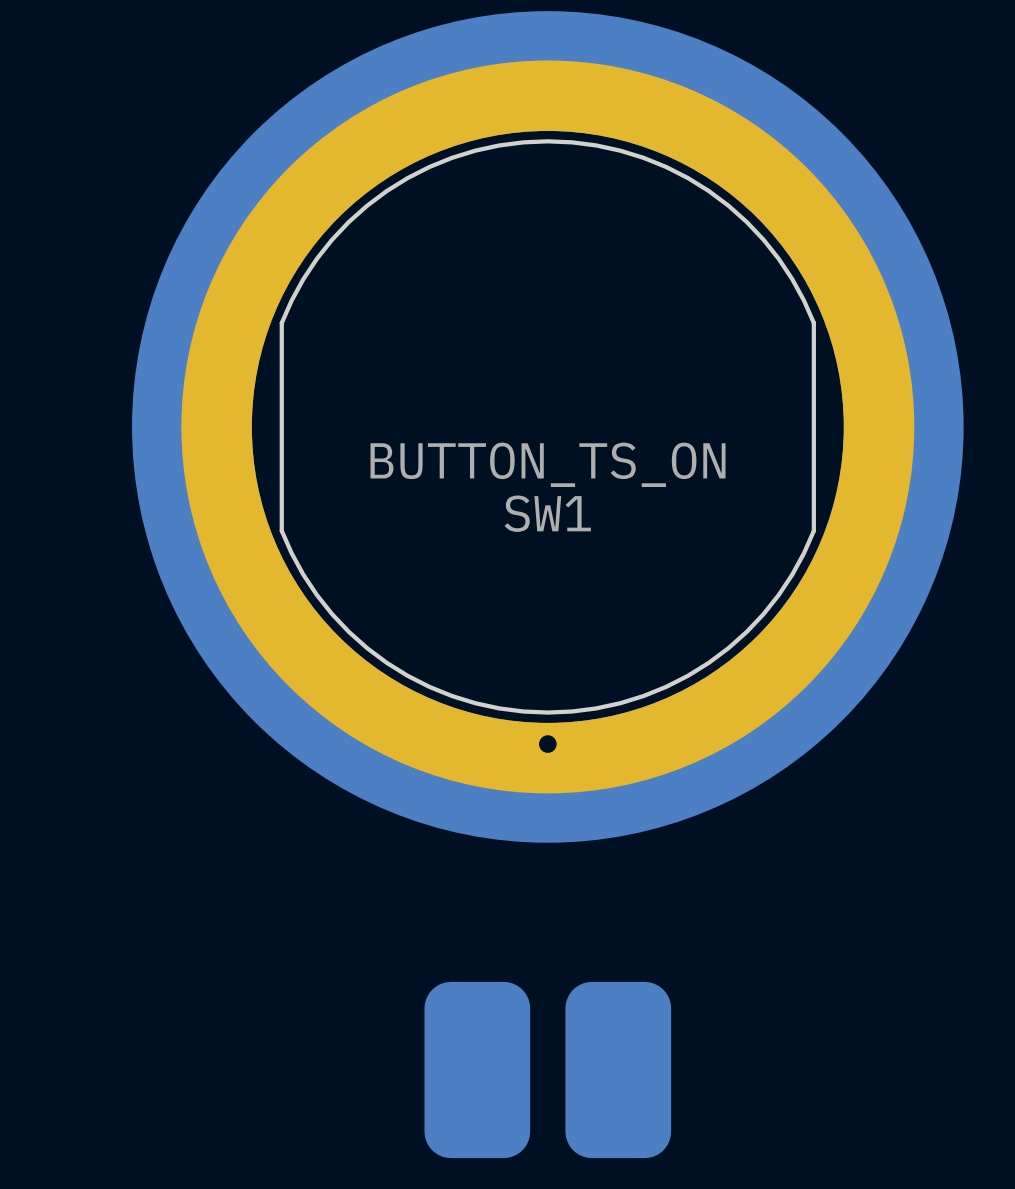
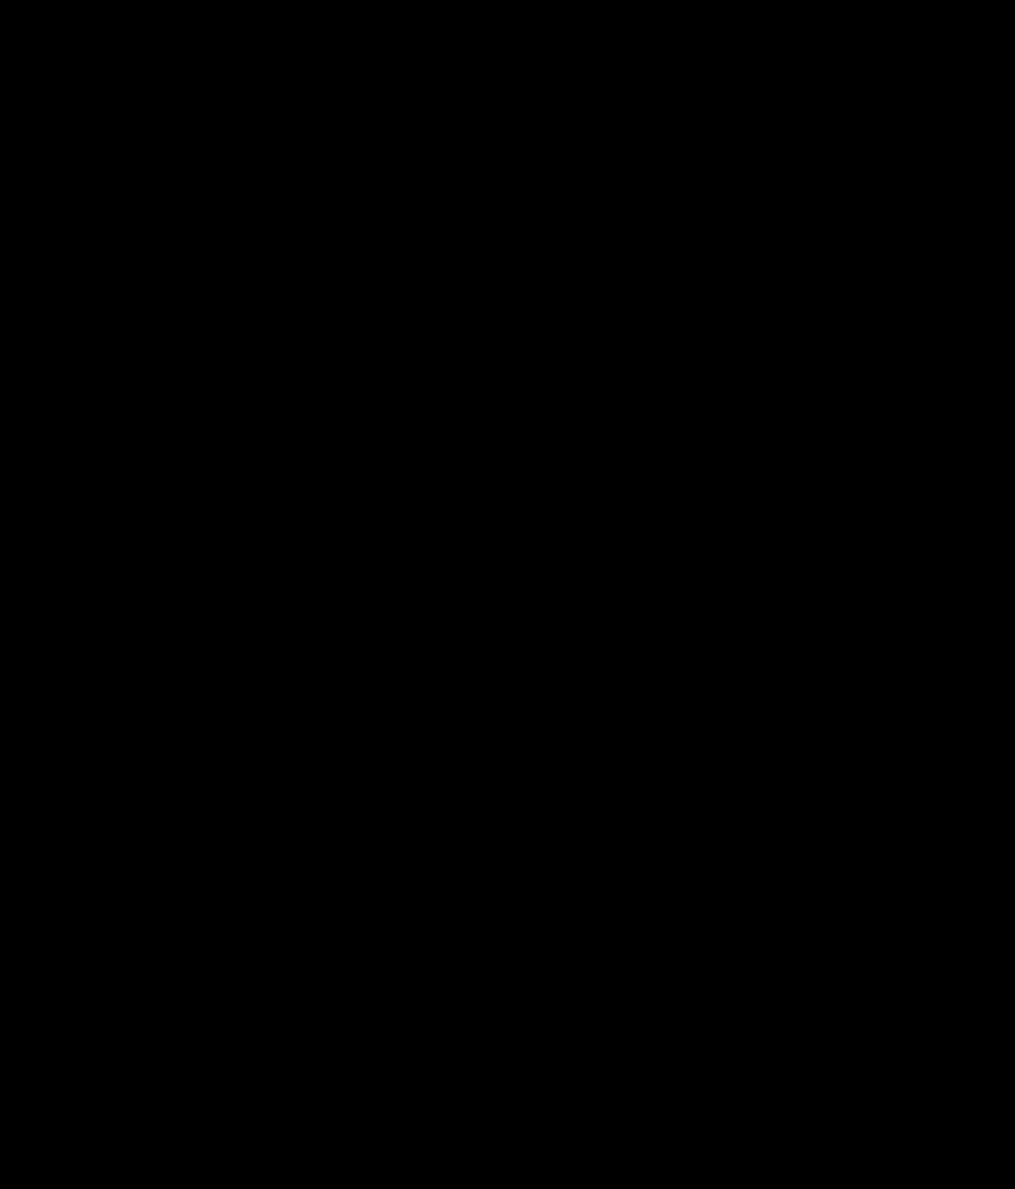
SW1: BUTTON_TS_ON (547, 584) -> none

